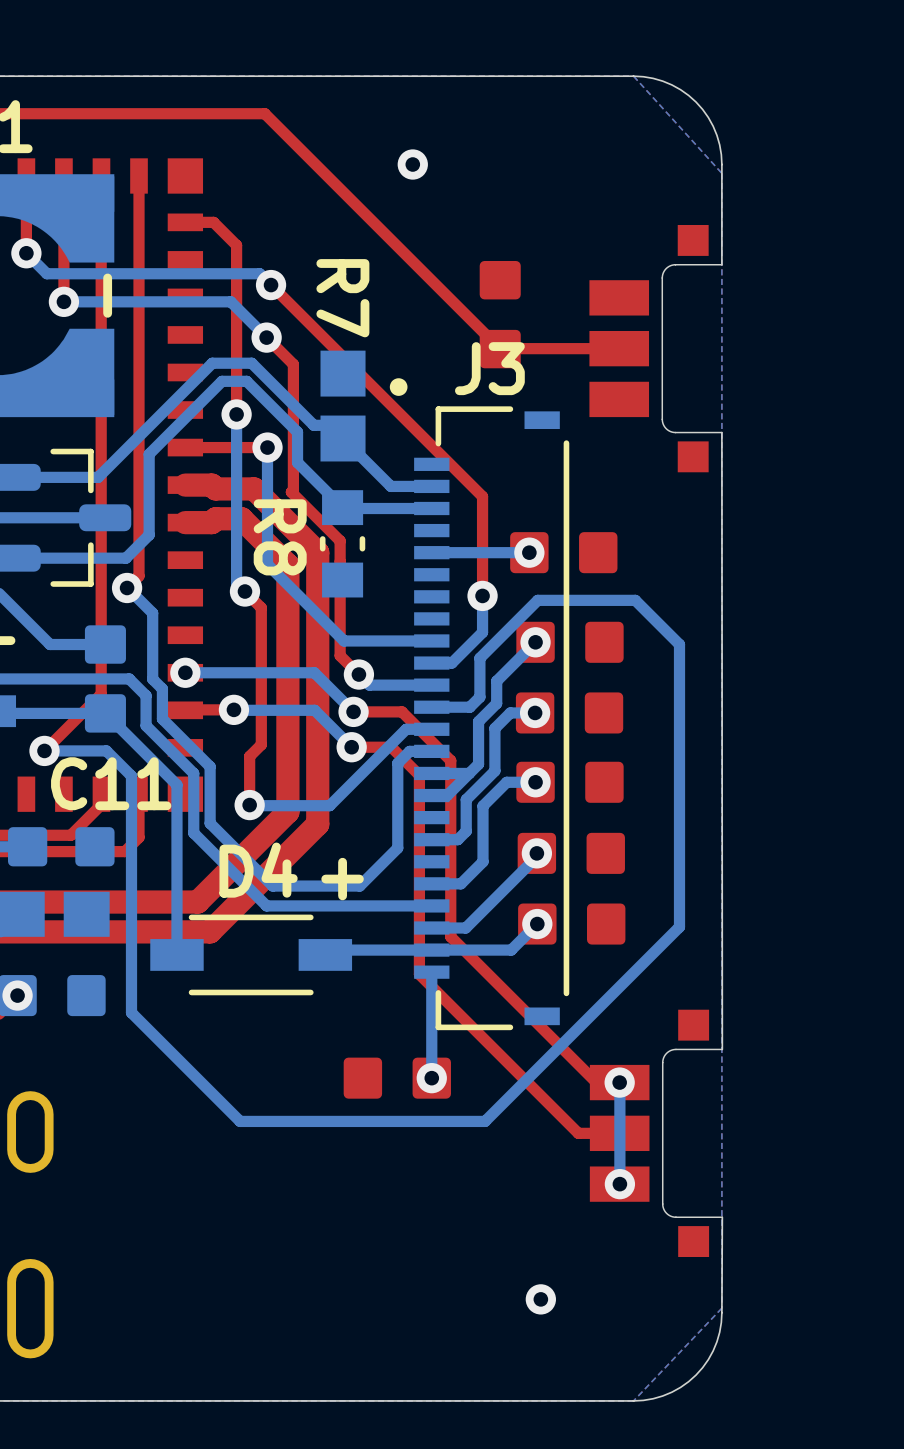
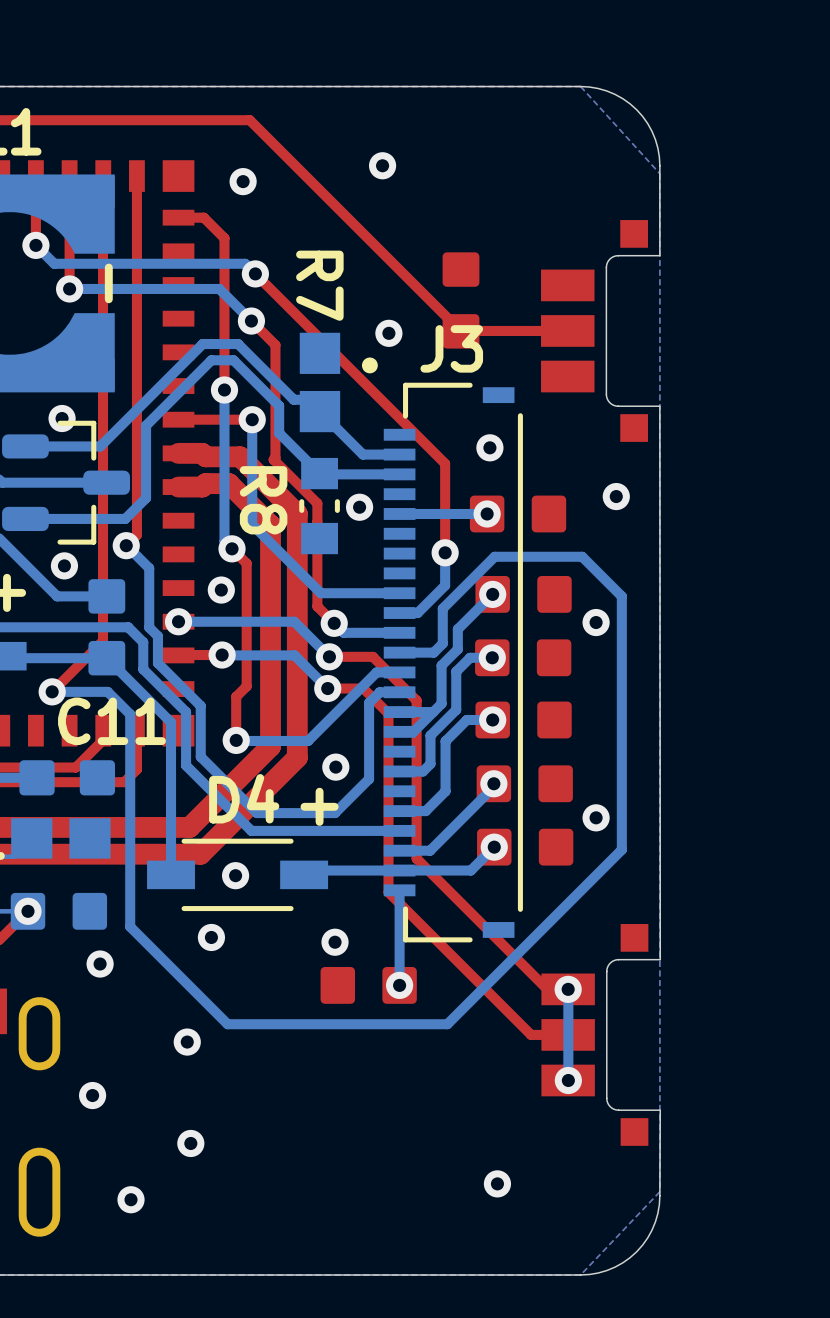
via: none -> (243, 181)
via: none -> (388, 333)
via: none -> (62, 418)
via: none -> (489, 447)
via: none -> (616, 496)
via: none -> (359, 507)
via: none -> (64, 565)
via: none -> (221, 590)
via: none -> (596, 622)
via: none -> (335, 767)
via: none -> (596, 817)
via: none -> (235, 875)
via: none -> (211, 937)
via: none -> (335, 942)
via: none -> (100, 964)
via: none -> (187, 1042)
via: none -> (92, 1095)
via: none -> (190, 1143)
via: none -> (131, 1199)

